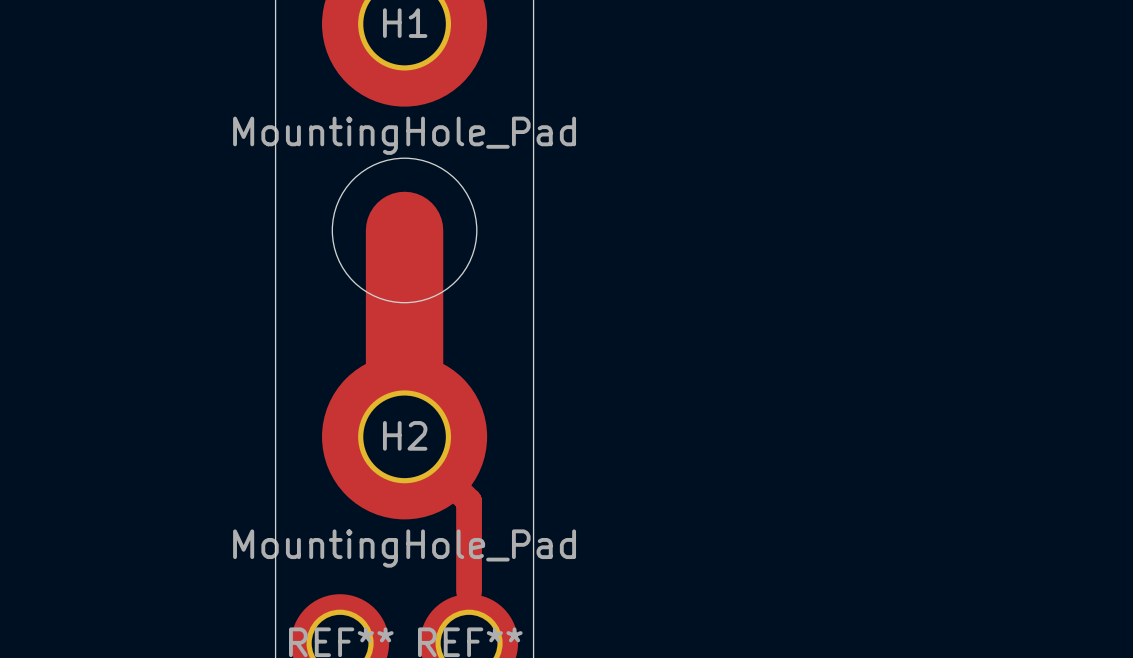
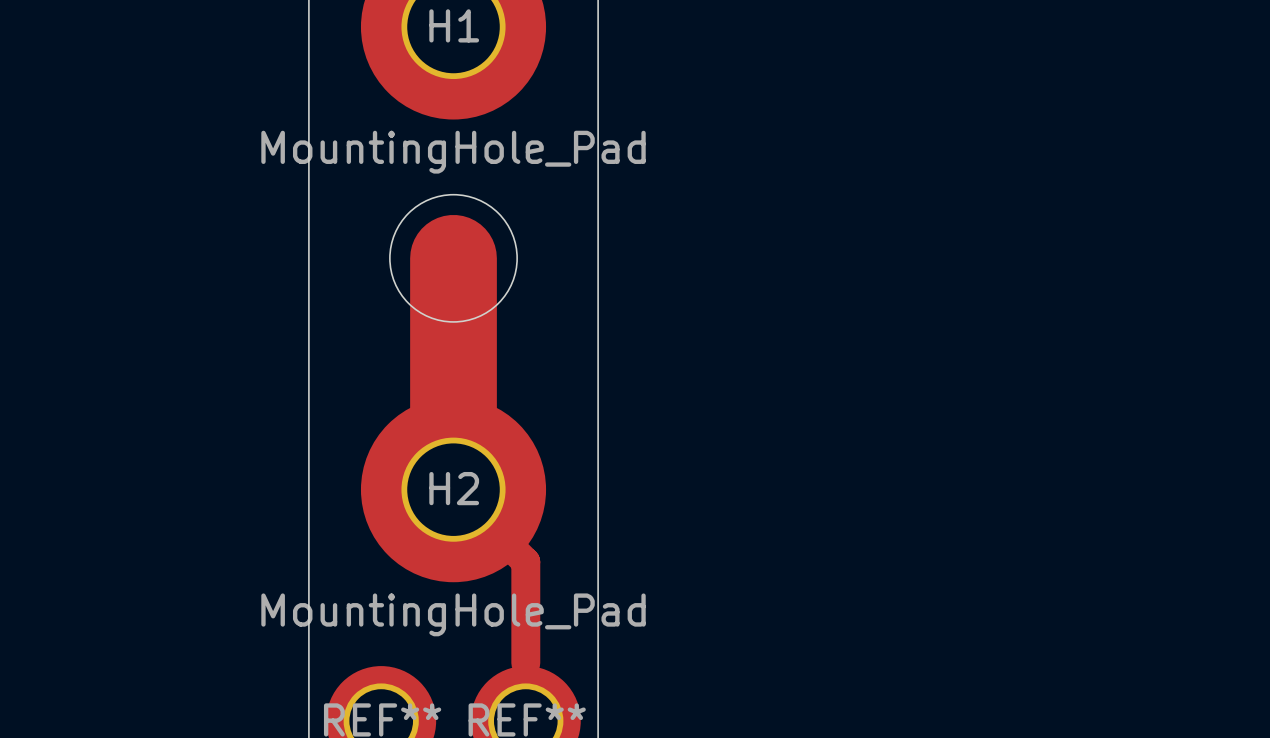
round board edge size: [331, 157, 478, 304] -> [389, 193, 518, 323]

